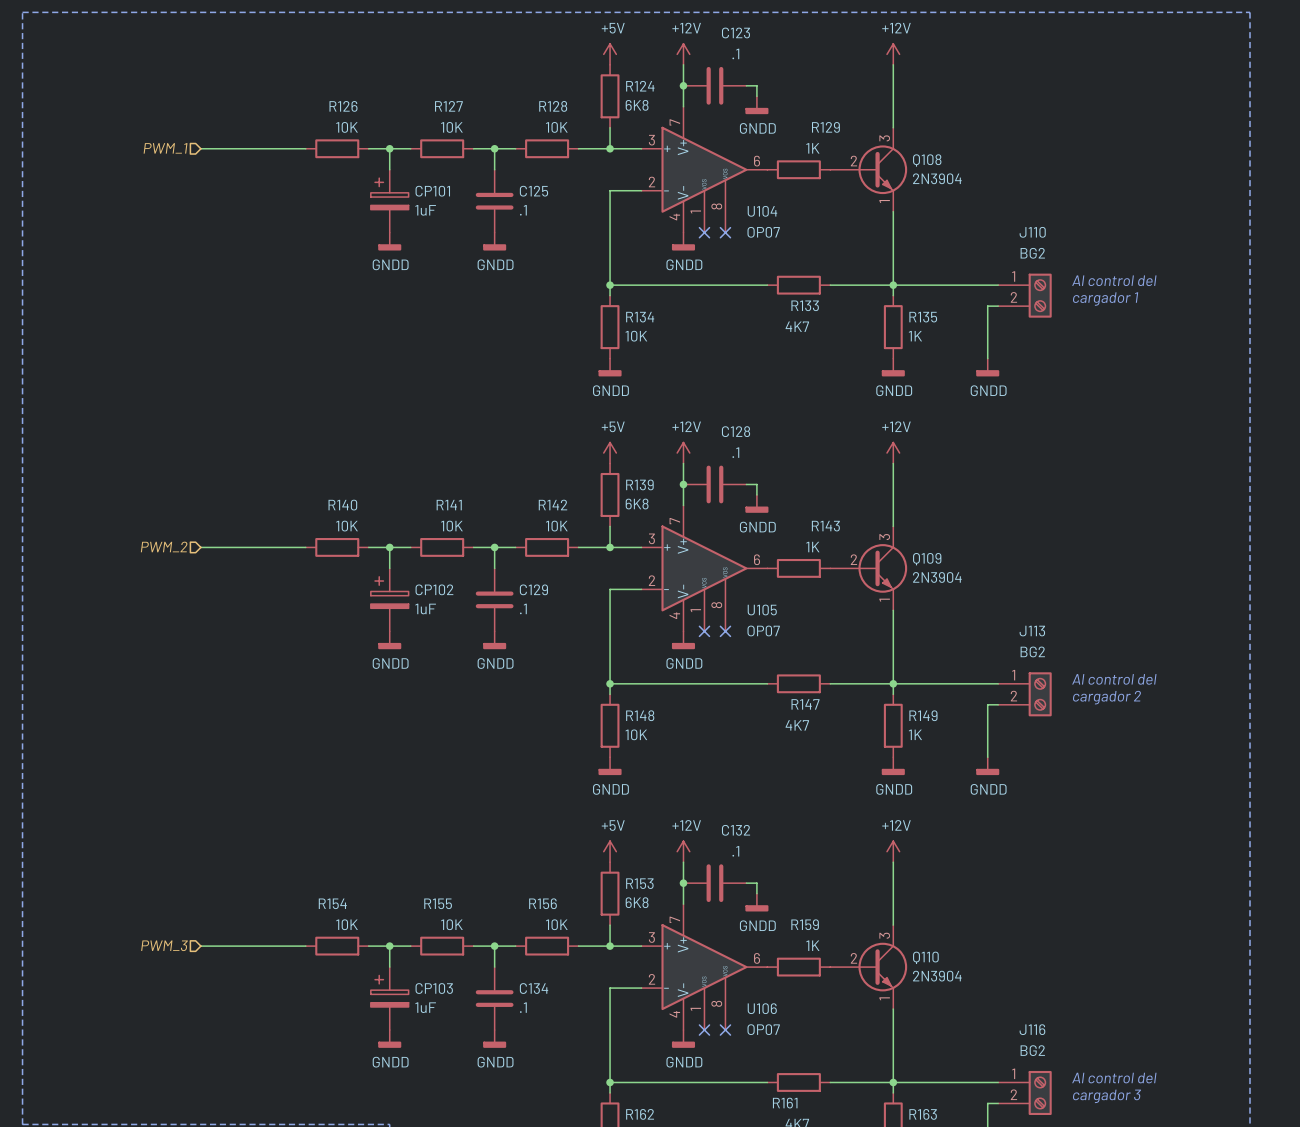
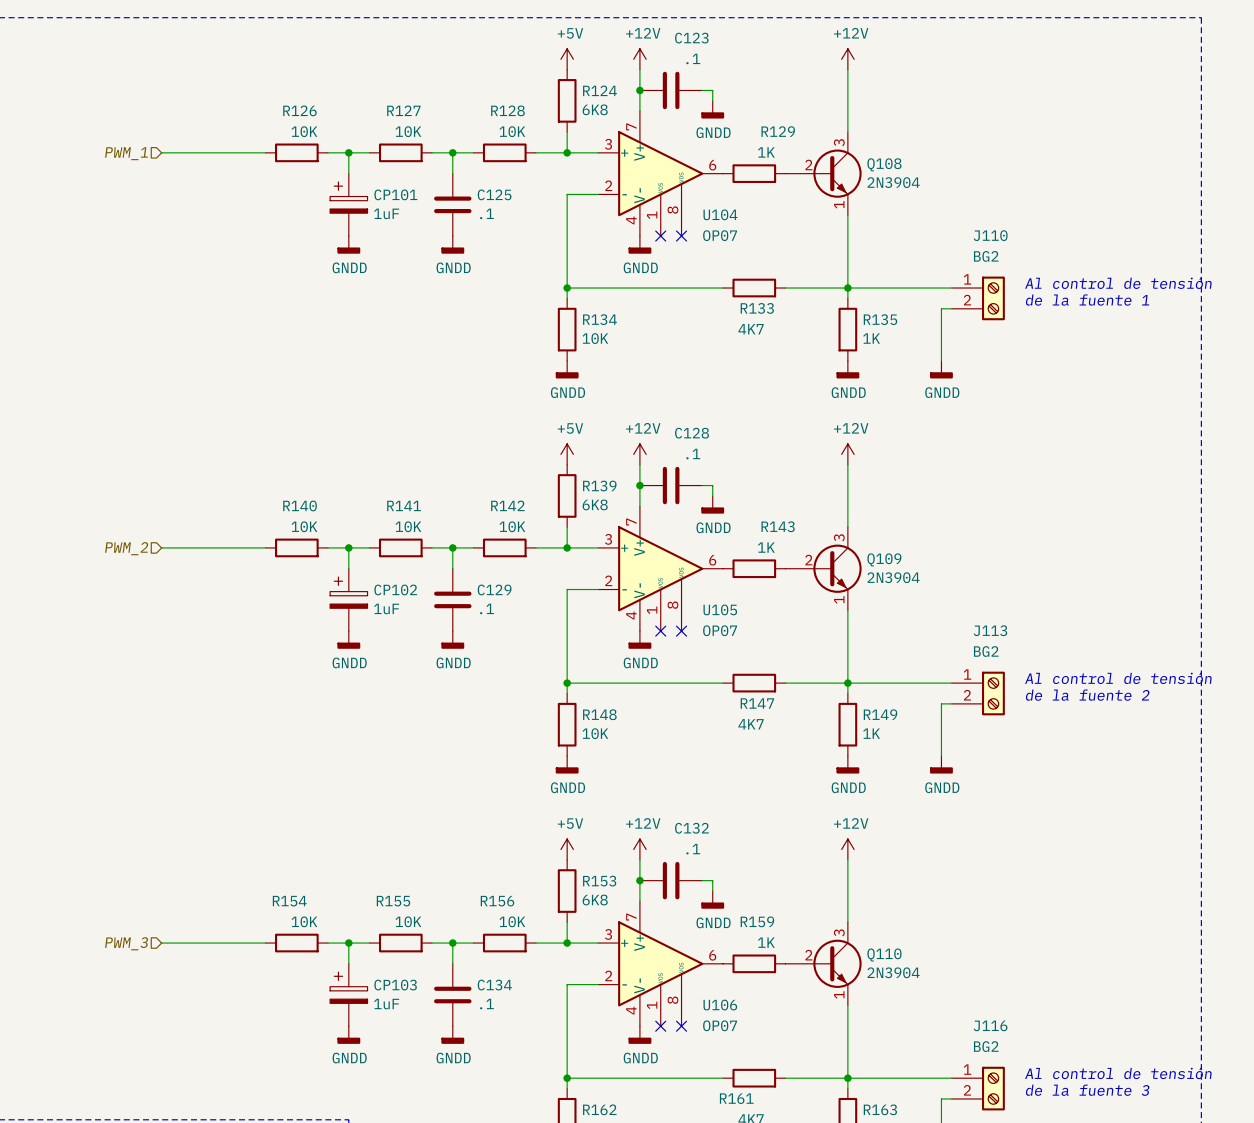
text: Al control del (1114, 280) -> Al control de tensión (1118, 283)
text: cargador 1 (1105, 299) -> de la fuente 1 (1087, 300)
text: Al control del (1114, 679) -> Al control de tensión (1118, 678)
text: cargador 2 (1106, 697) -> de la fuente 2 (1087, 695)
text: Al control del (1114, 1078) -> Al control de tensión (1118, 1073)
text: cargador 3 (1106, 1096) -> de la fuente 3 (1087, 1090)

